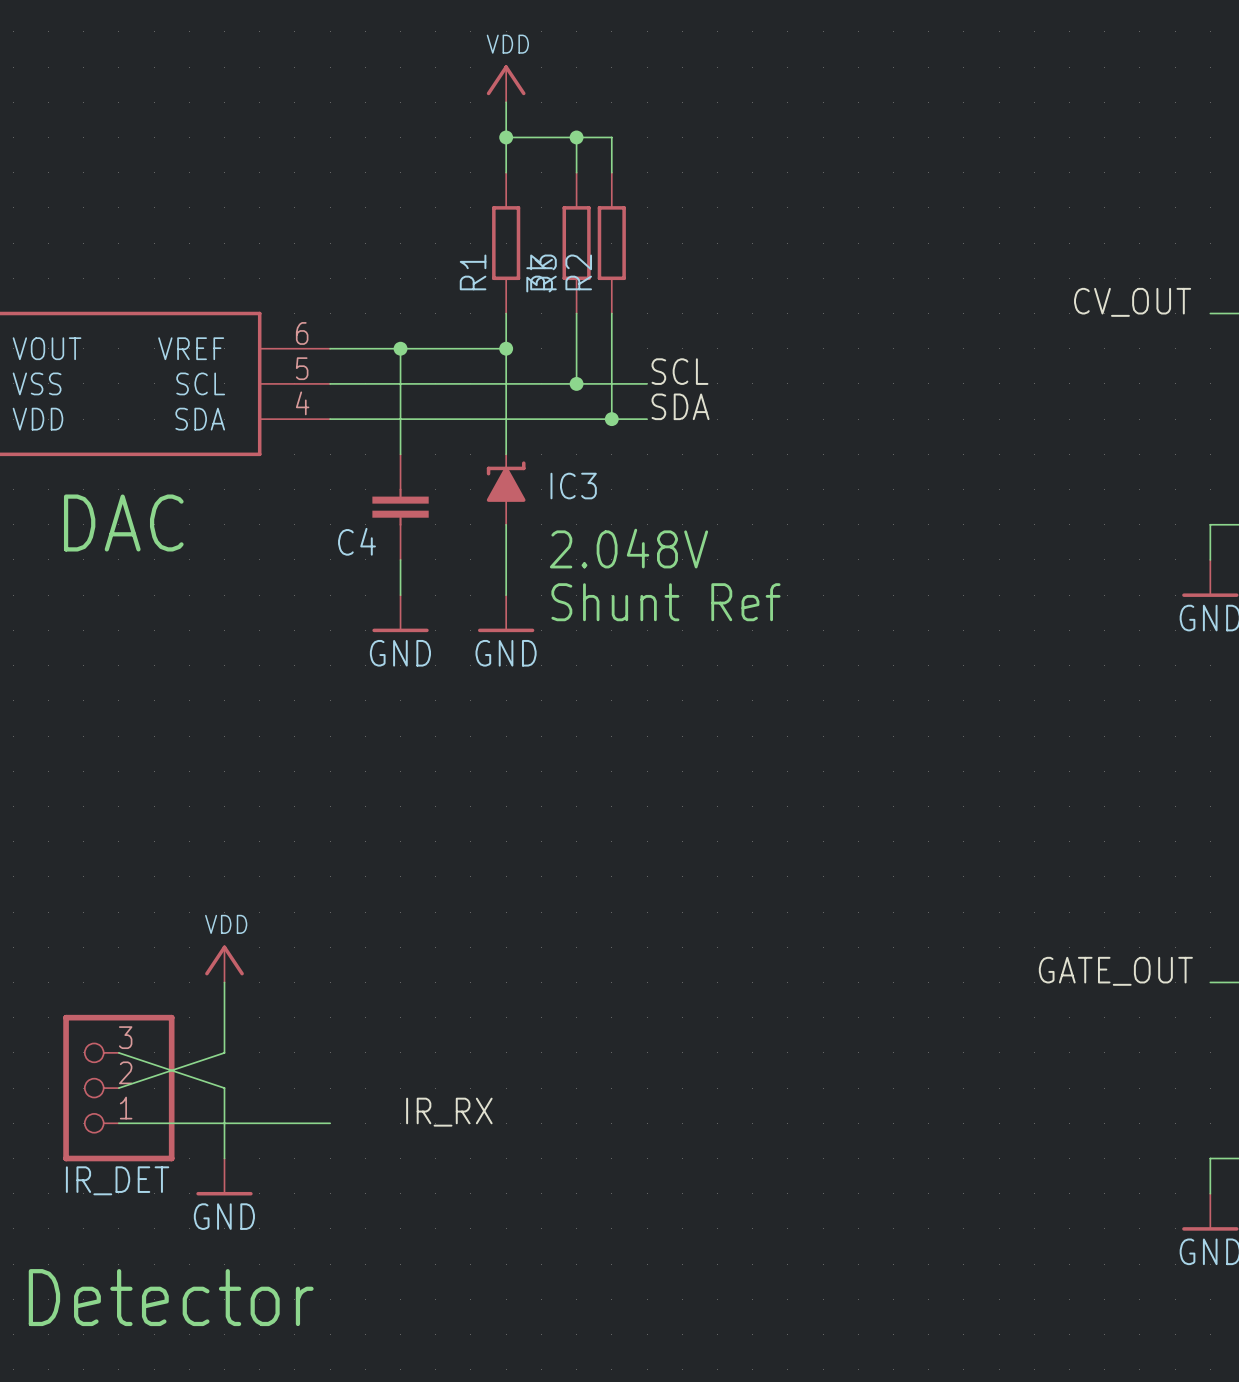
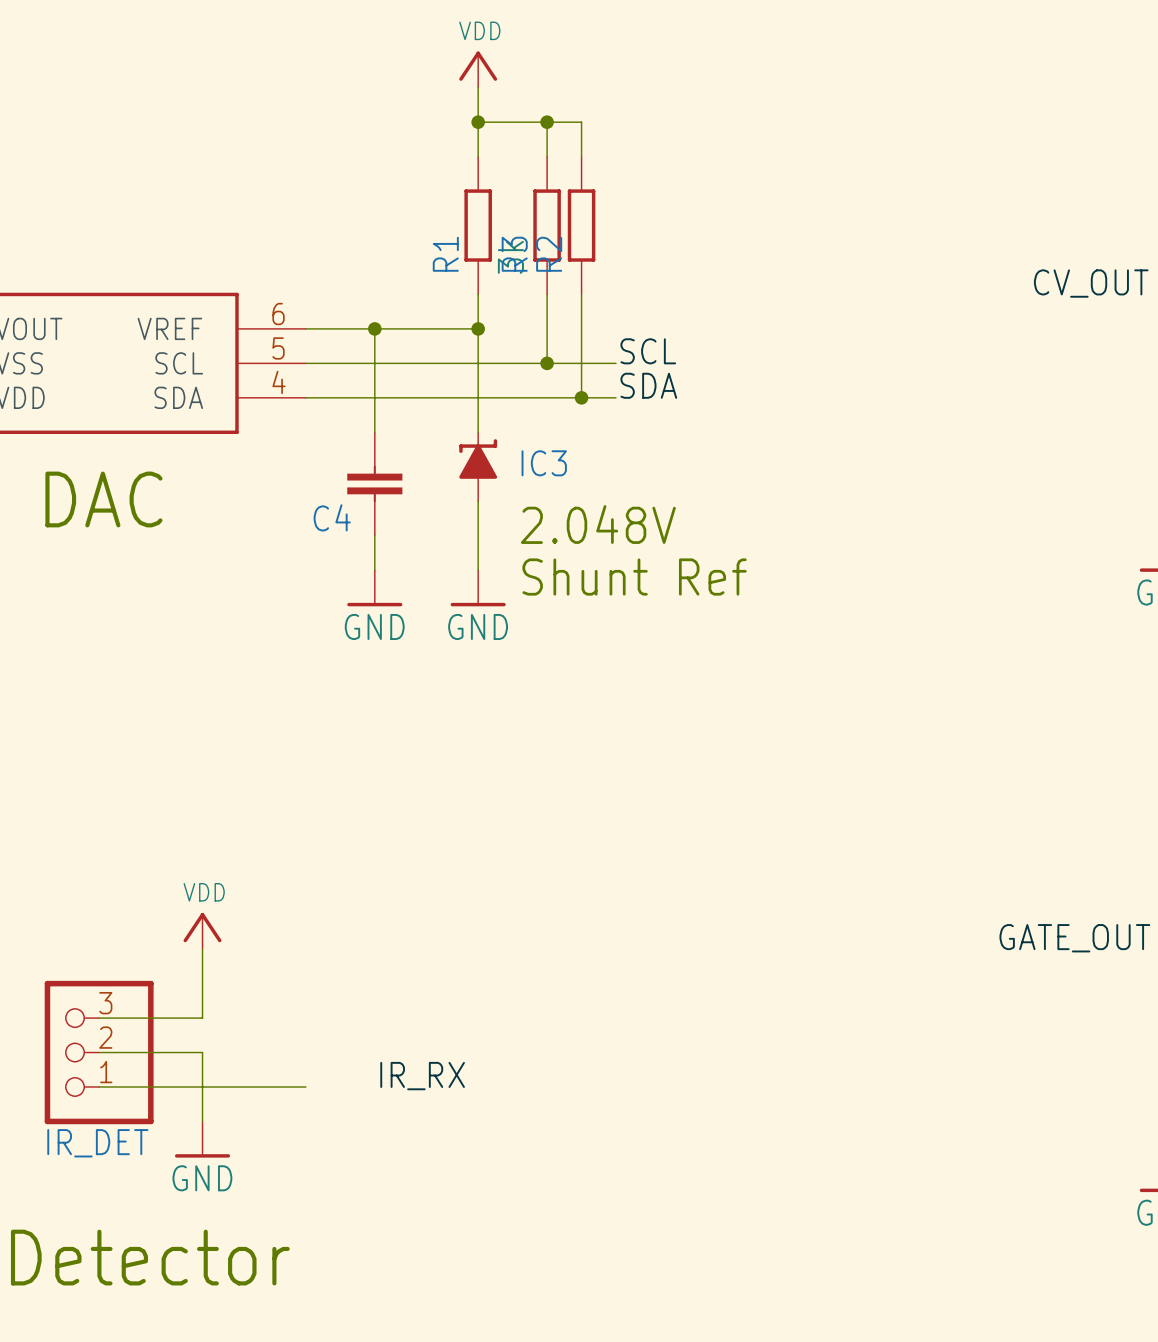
wire: (118, 1052) (224, 1088) -> (99, 1018) (202, 1018)
wire: (224, 1052) (118, 1088) -> (202, 1052) (99, 1052)

